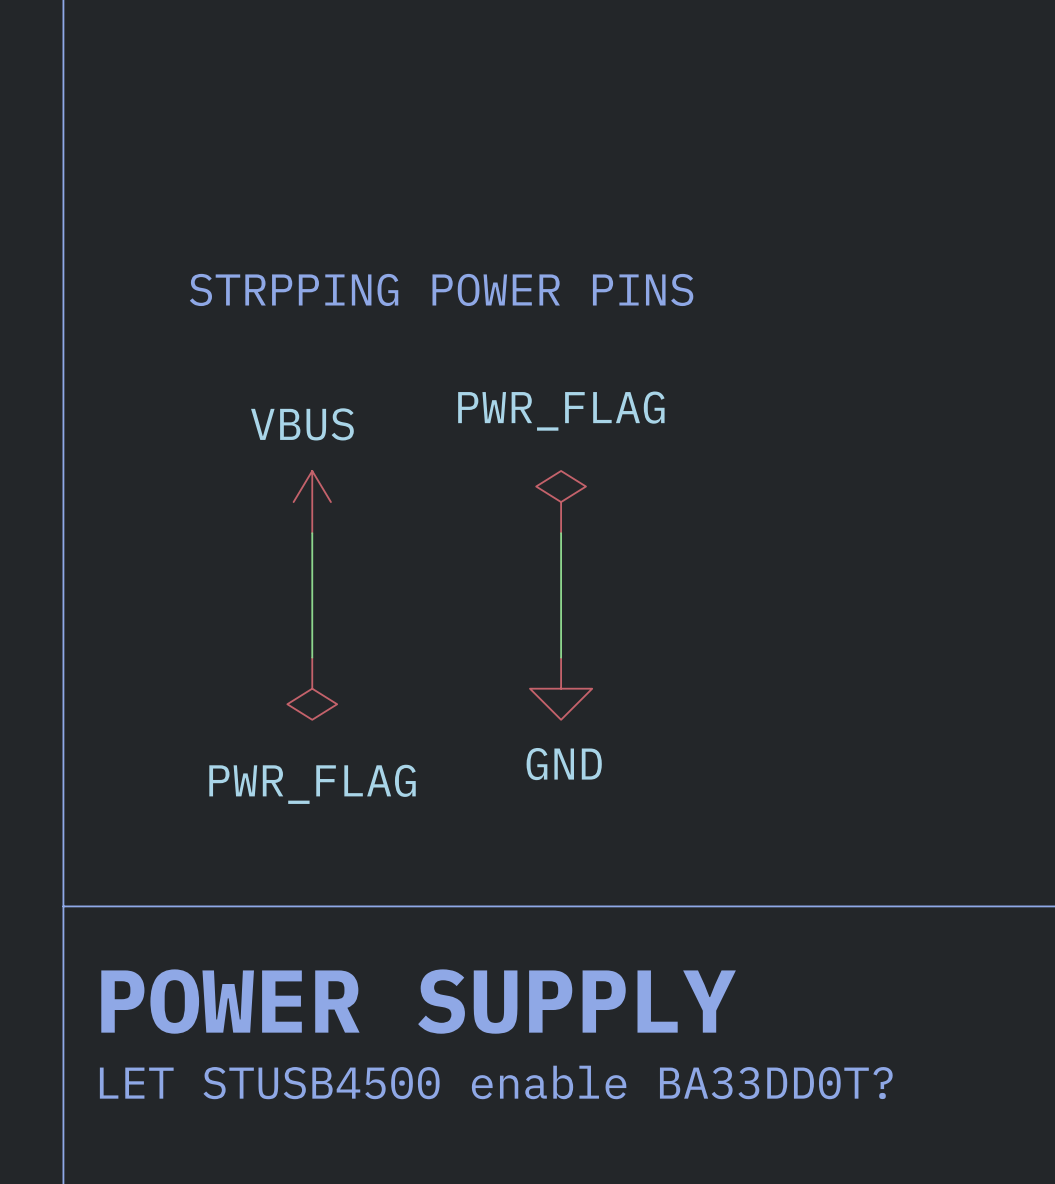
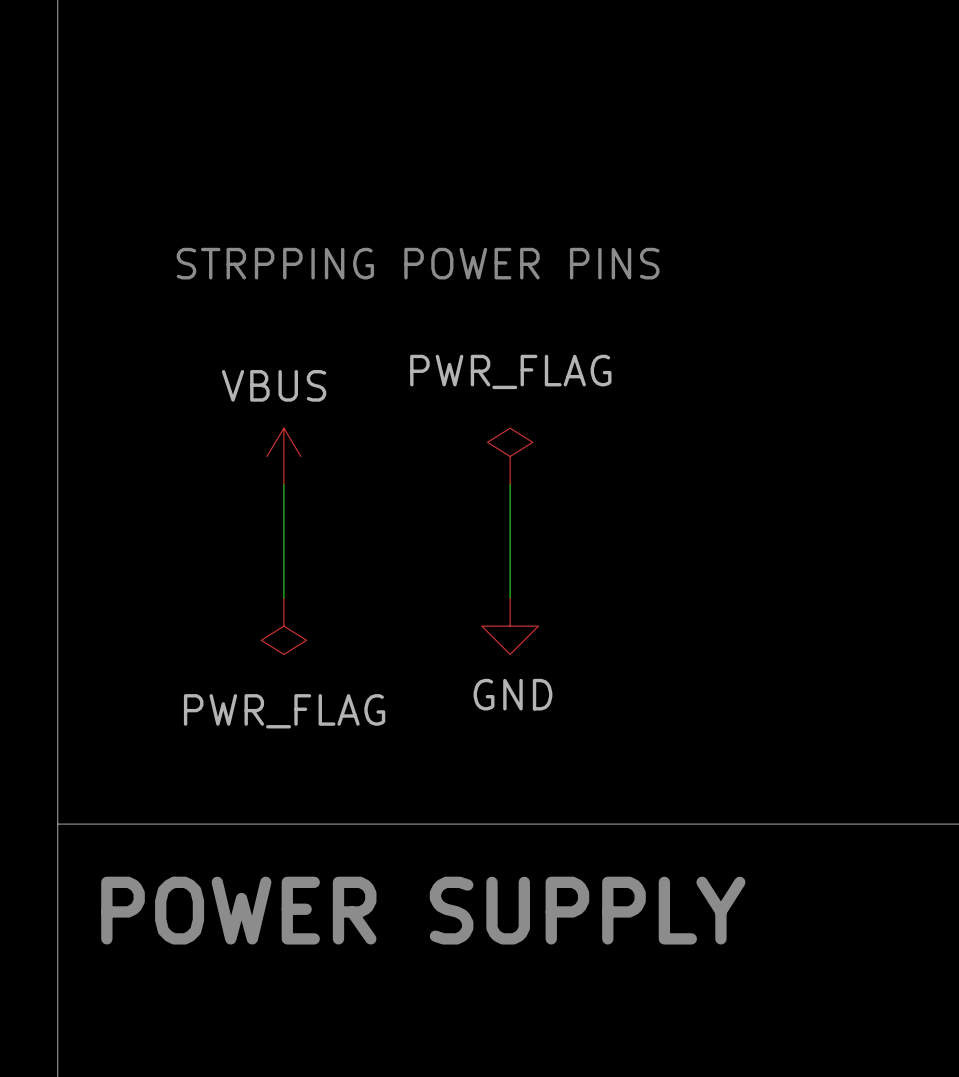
text: LET STUSB4500 enable BA33DD0T? (496, 1082) -> none

